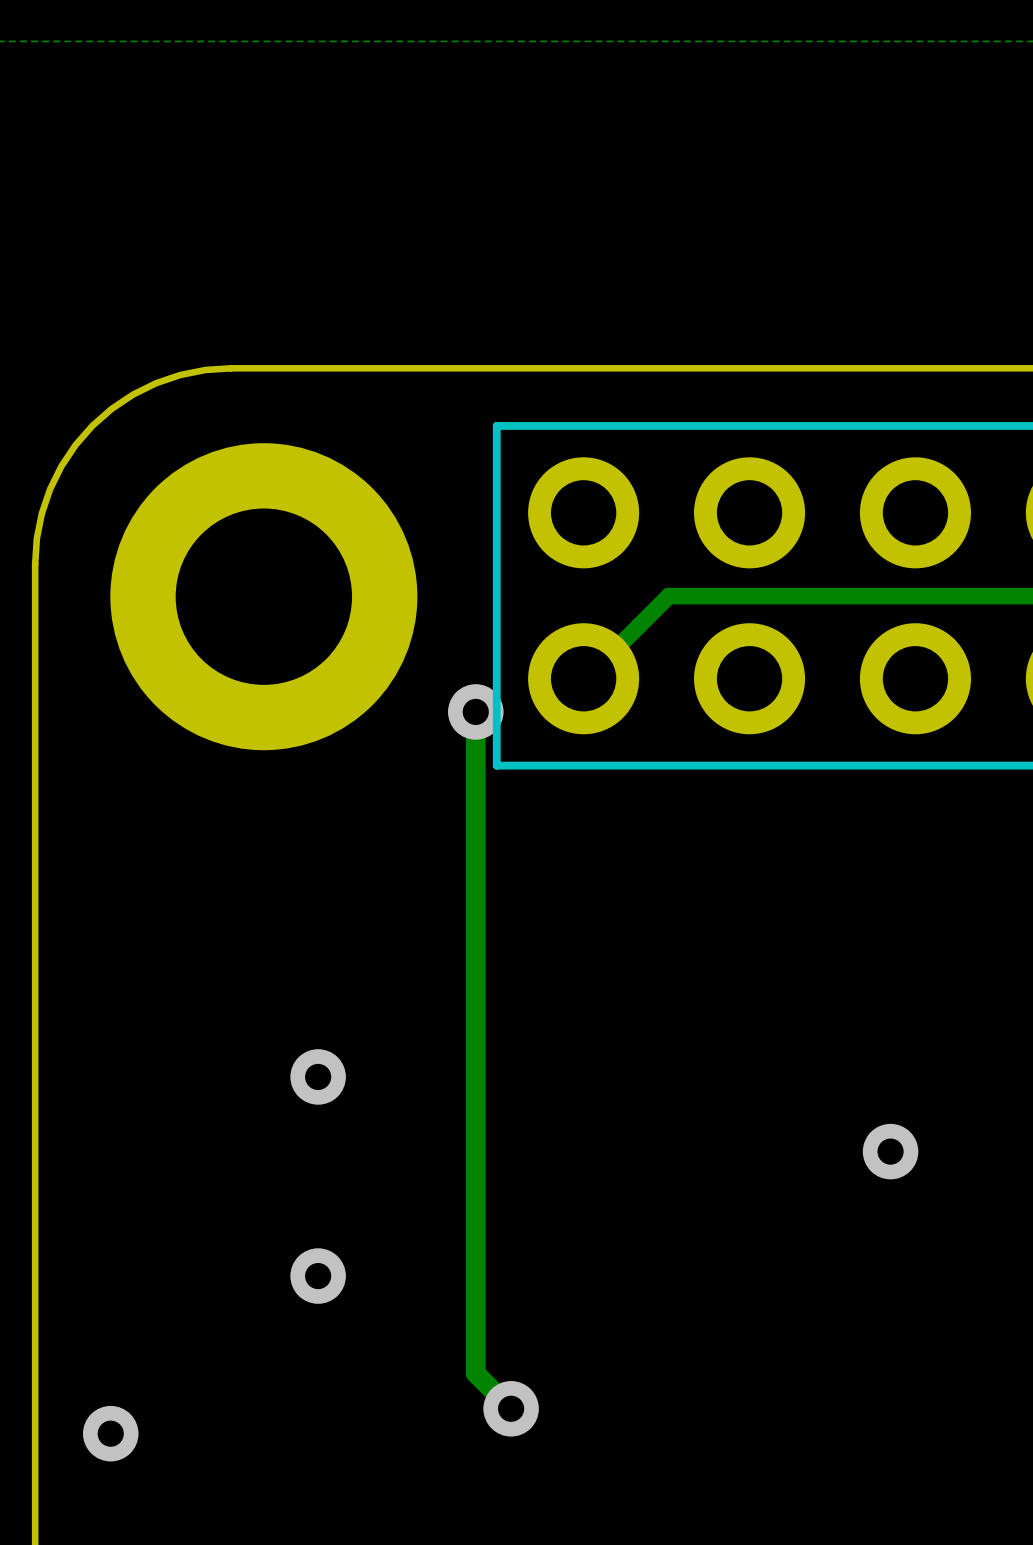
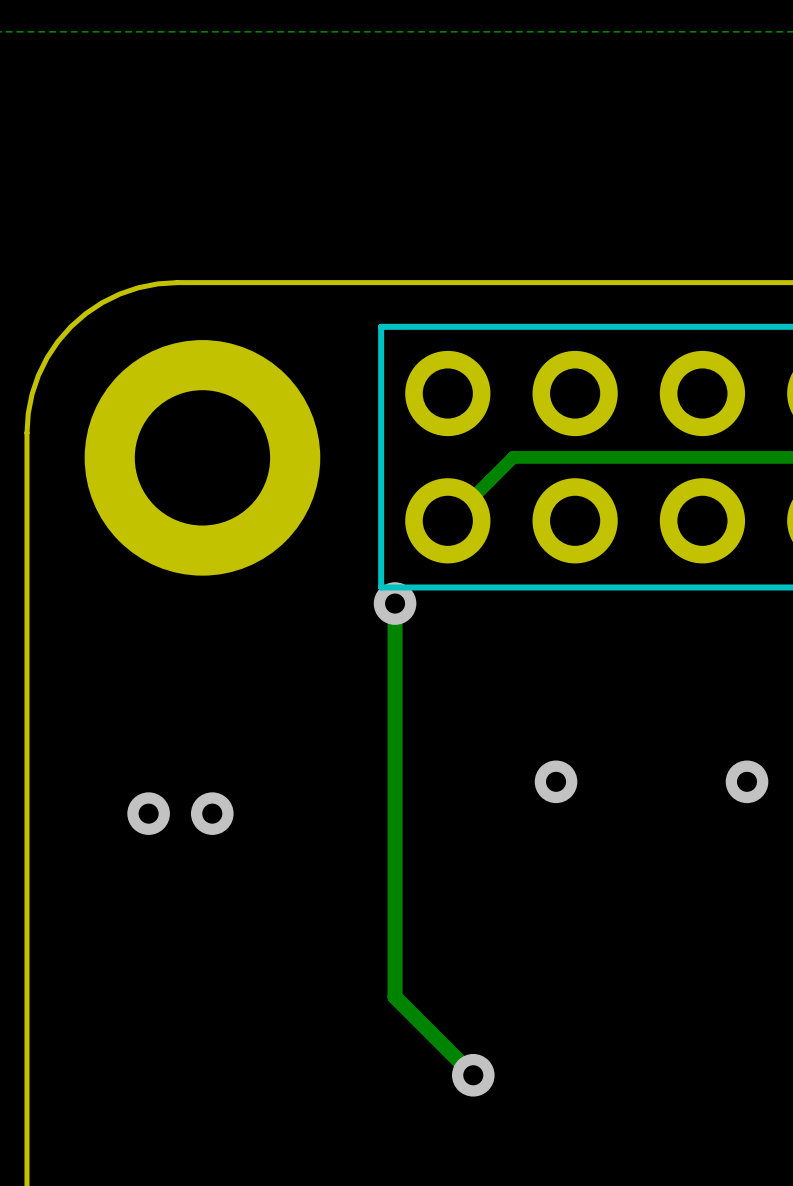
track: (475, 711) (475, 1373) (511, 1408) -> none
via position: (475, 711) -> (395, 603)
track: none -> (395, 603) (395, 997) (473, 1075)
via: none -> (556, 781)
via: none -> (747, 781)
via: none -> (148, 813)
via position: (318, 1076) -> (212, 813)
via: (890, 1151) -> none
via: (318, 1276) -> none
via position: (511, 1408) -> (473, 1075)
via: (110, 1433) -> none

